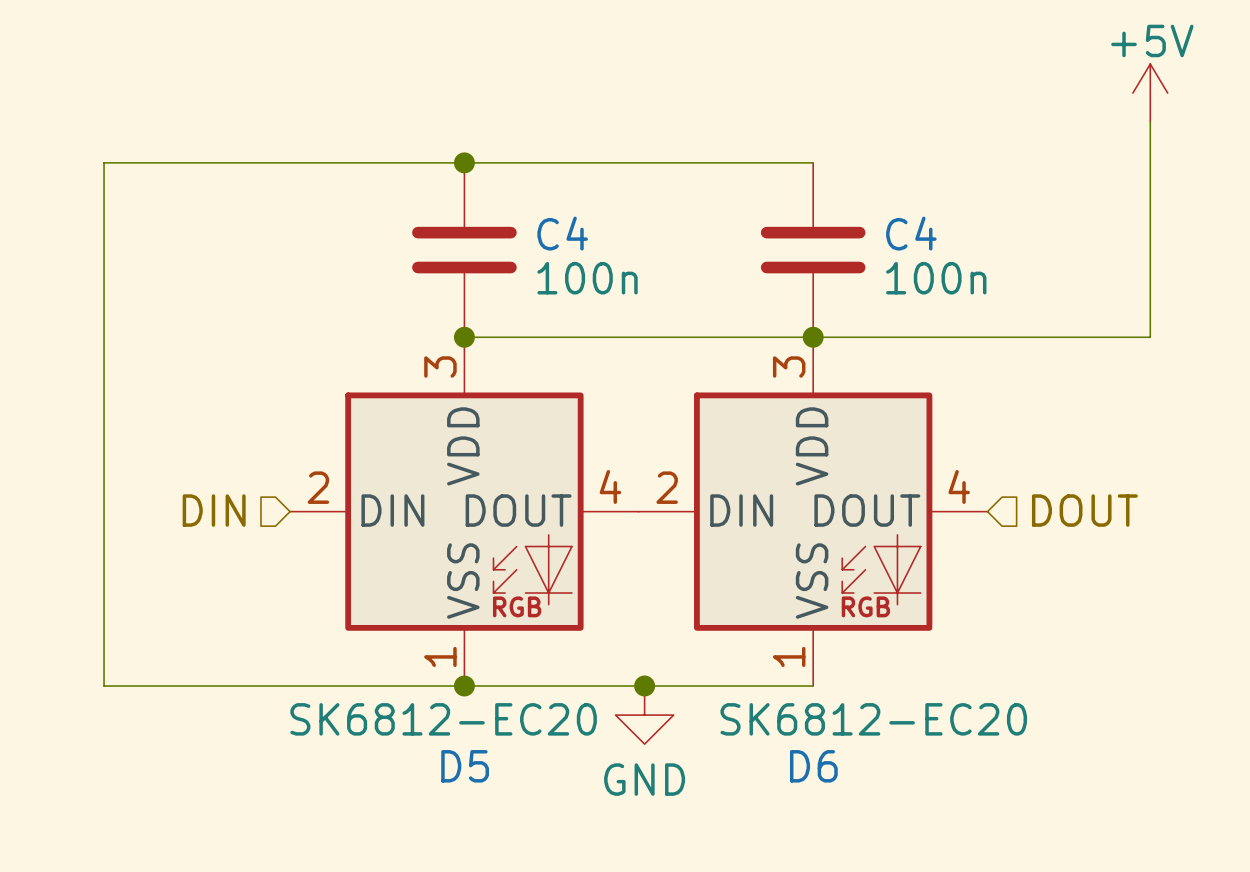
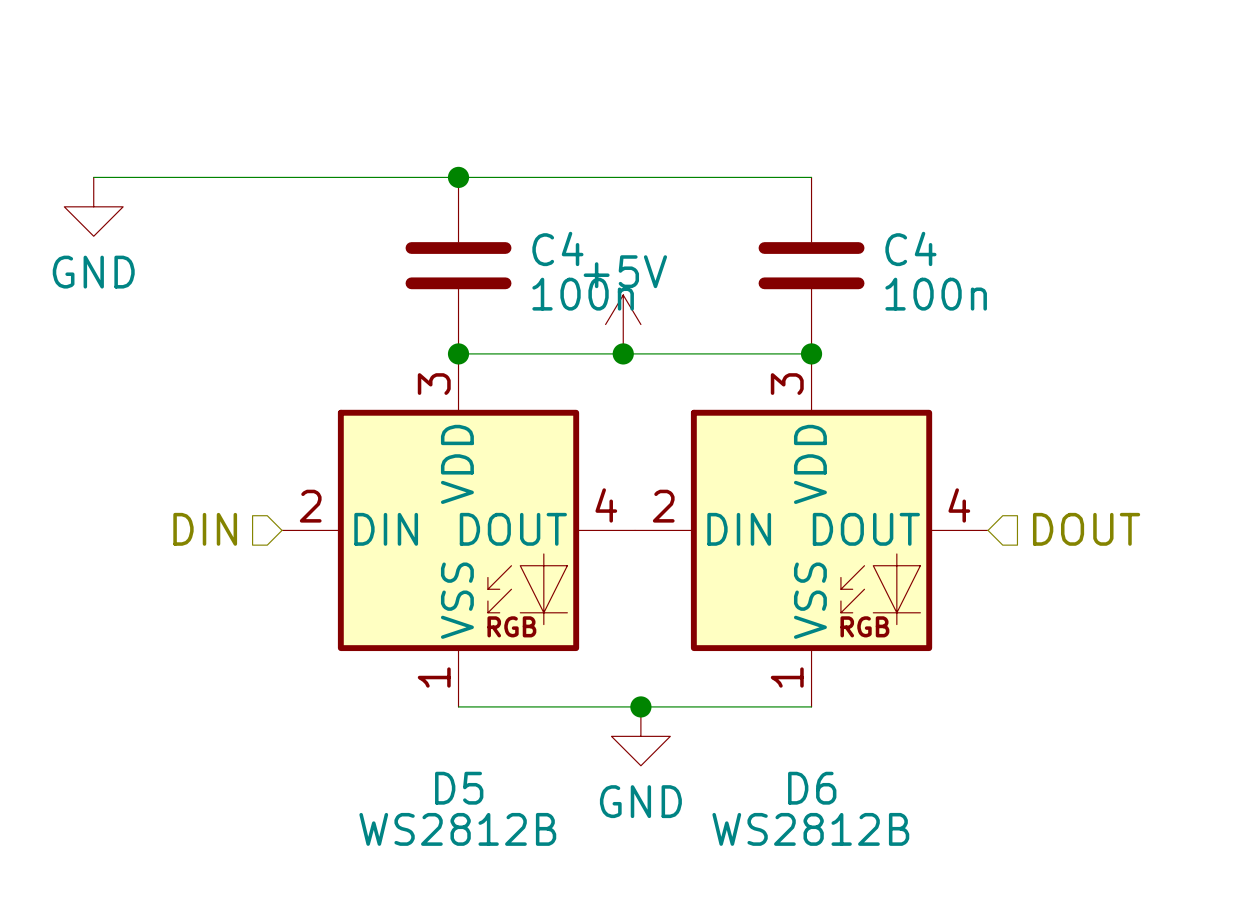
power symbol position: +5V (1150, 93) -> +5V (623, 324)
wire: (1150, 122) (1150, 337) (813, 337) -> none
wire: (104, 162) (104, 686) (464, 686) -> none
power symbol: none -> GND (93, 206)
junction: none -> (623, 353)
junction: (464, 686) -> none
D5 value: SK6812-EC20 (443, 719) -> WS2812B (457, 829)
D6 value: SK6812-EC20 (873, 719) -> WS2812B (810, 829)

